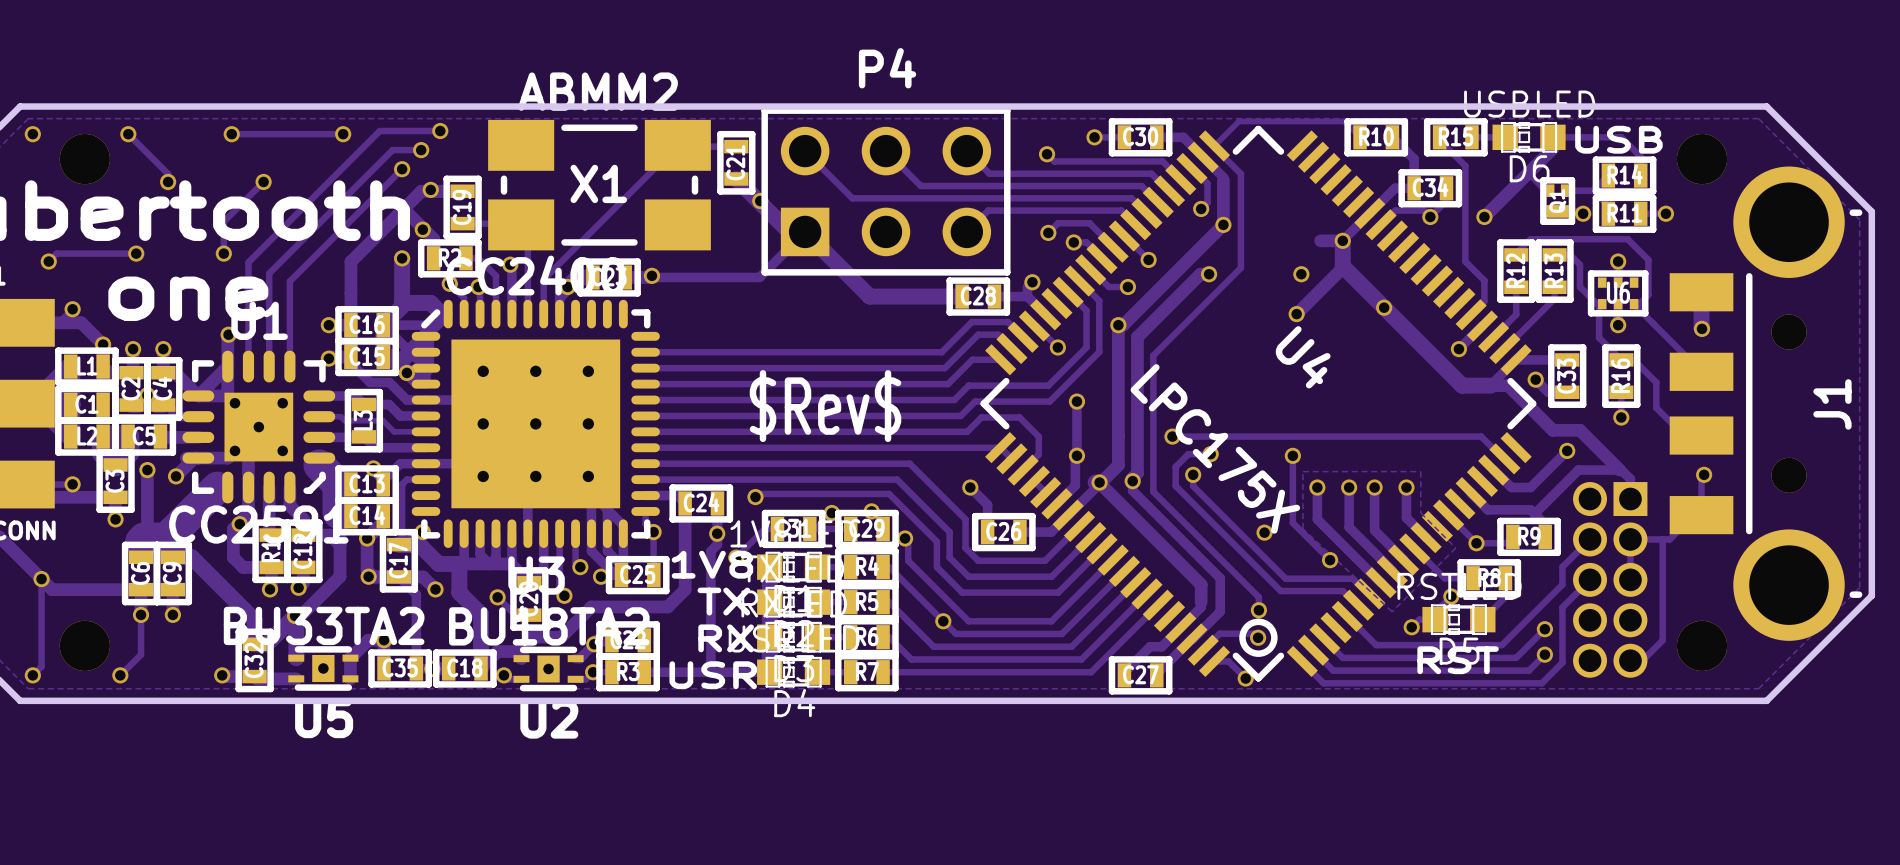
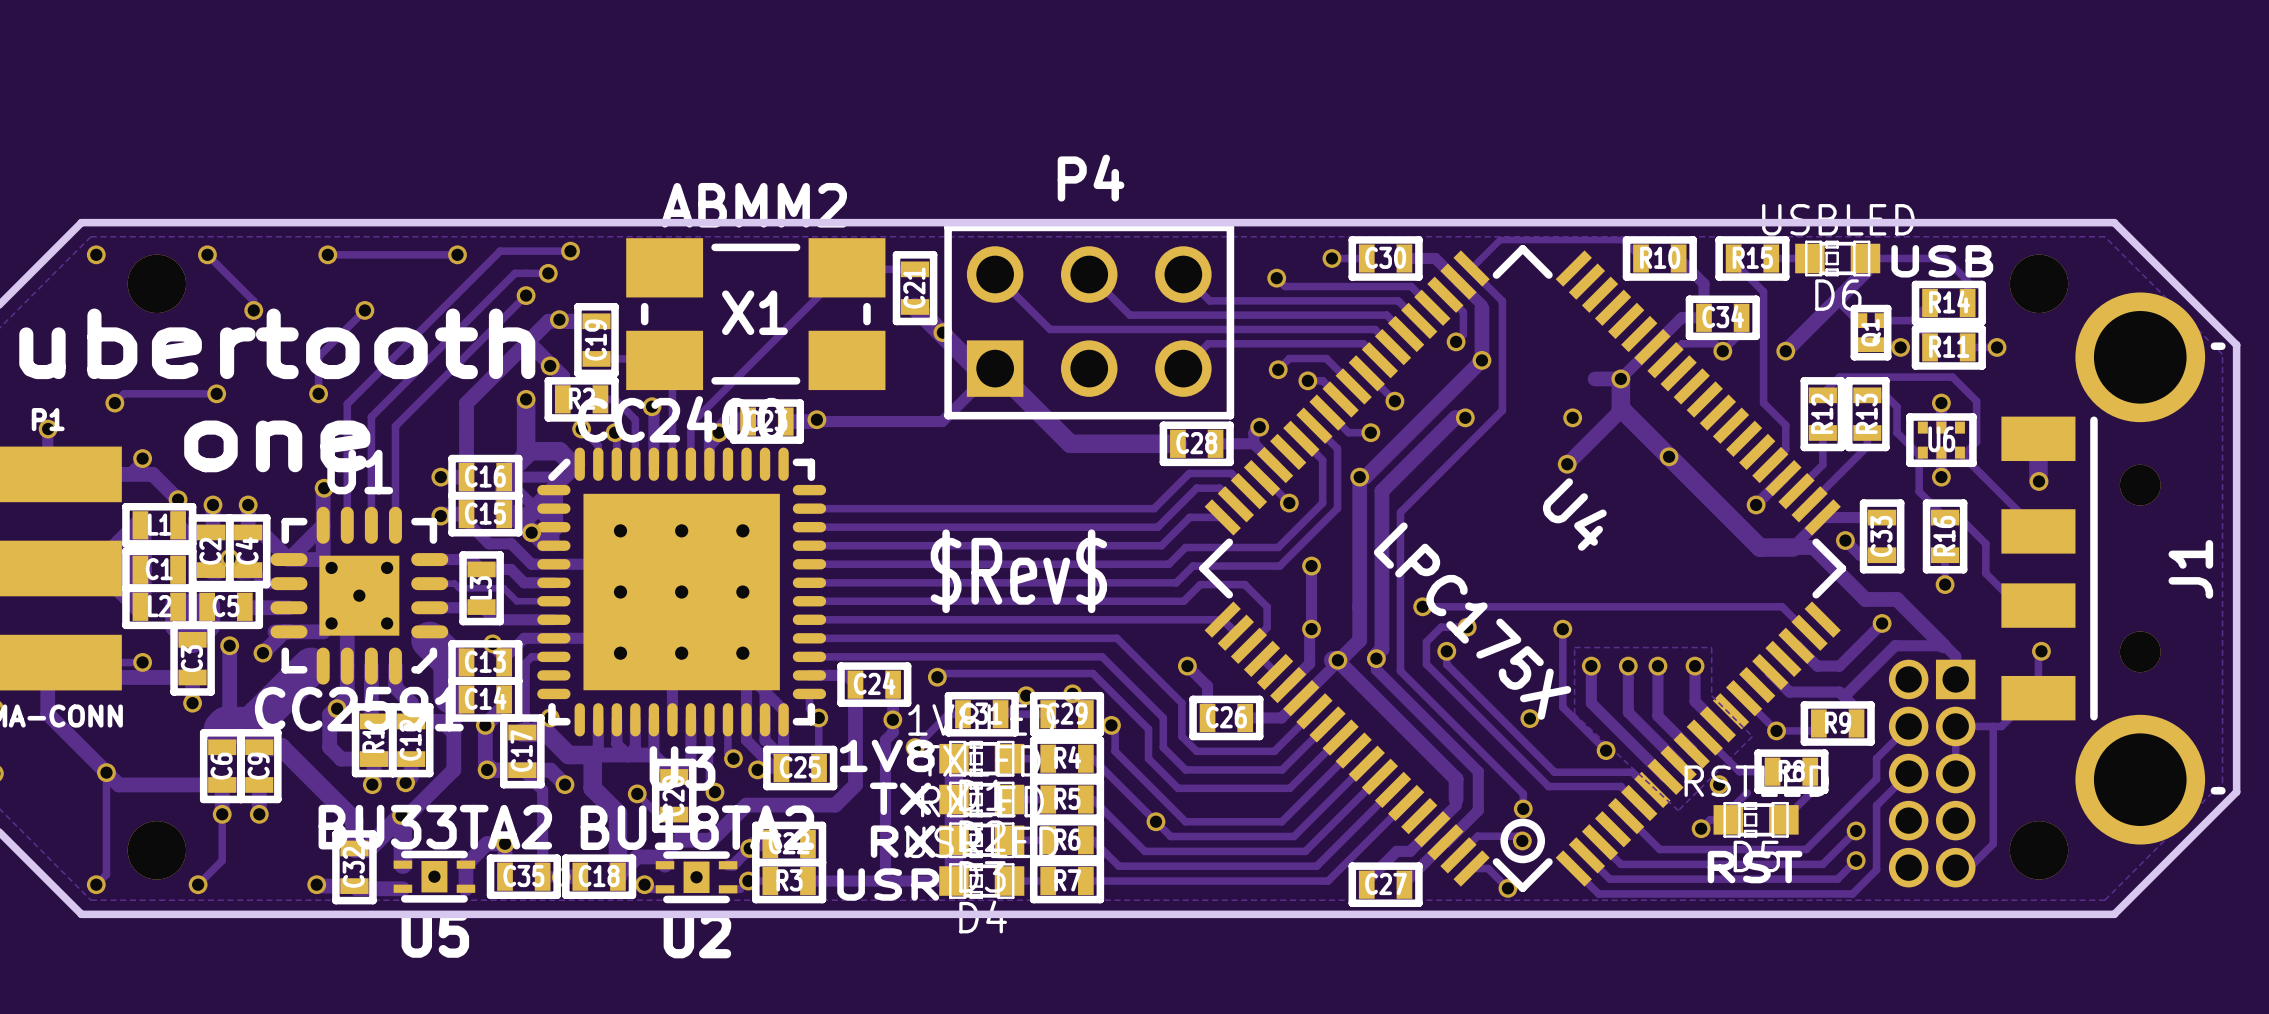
via position: (1451, 596) -> (1719, 784)

